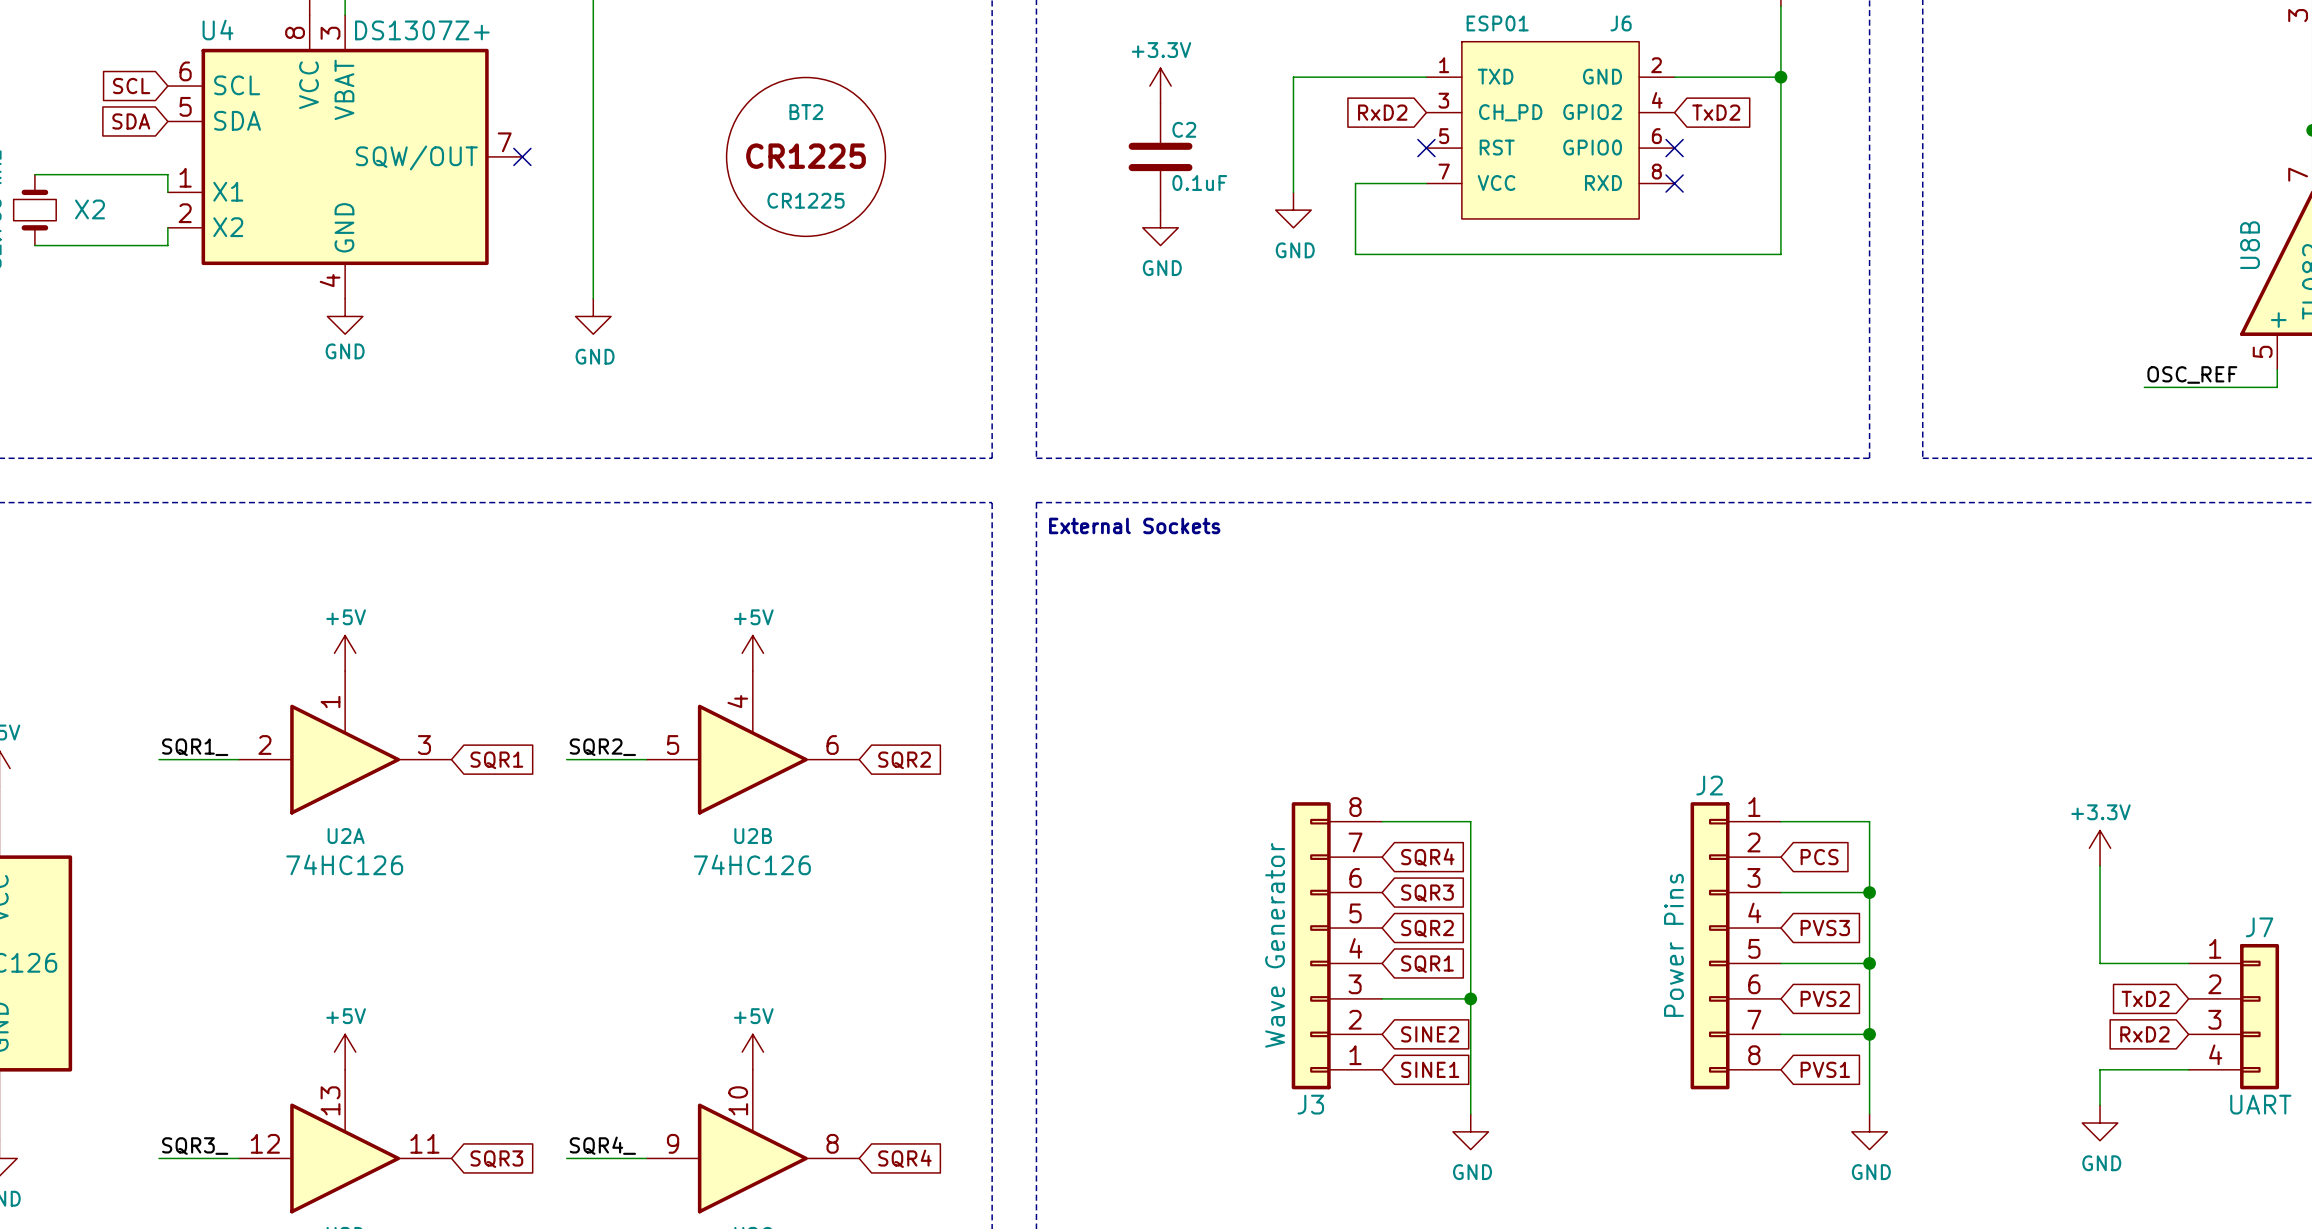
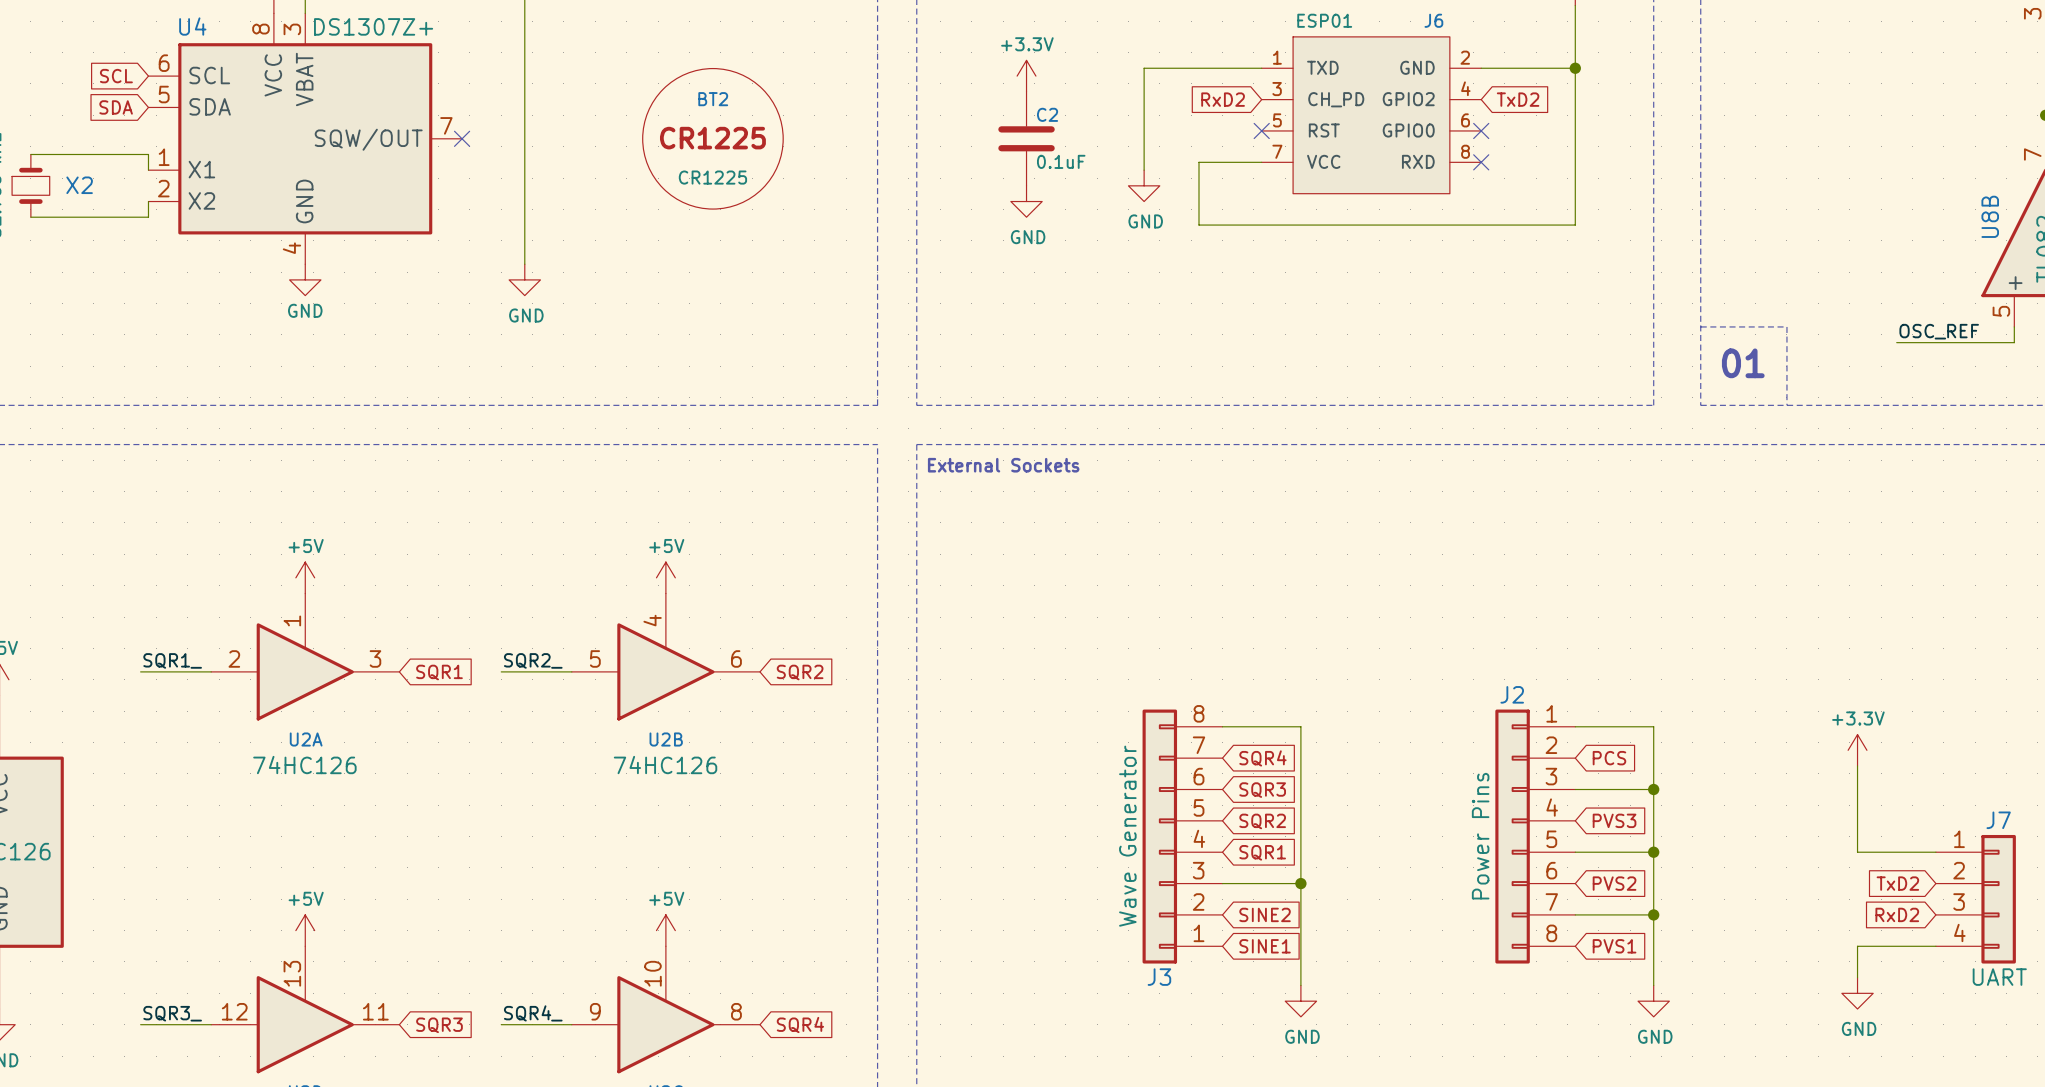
line: none -> (1700, 326) (1786, 326) (1786, 405)
text: none -> 01 (1743, 363)

